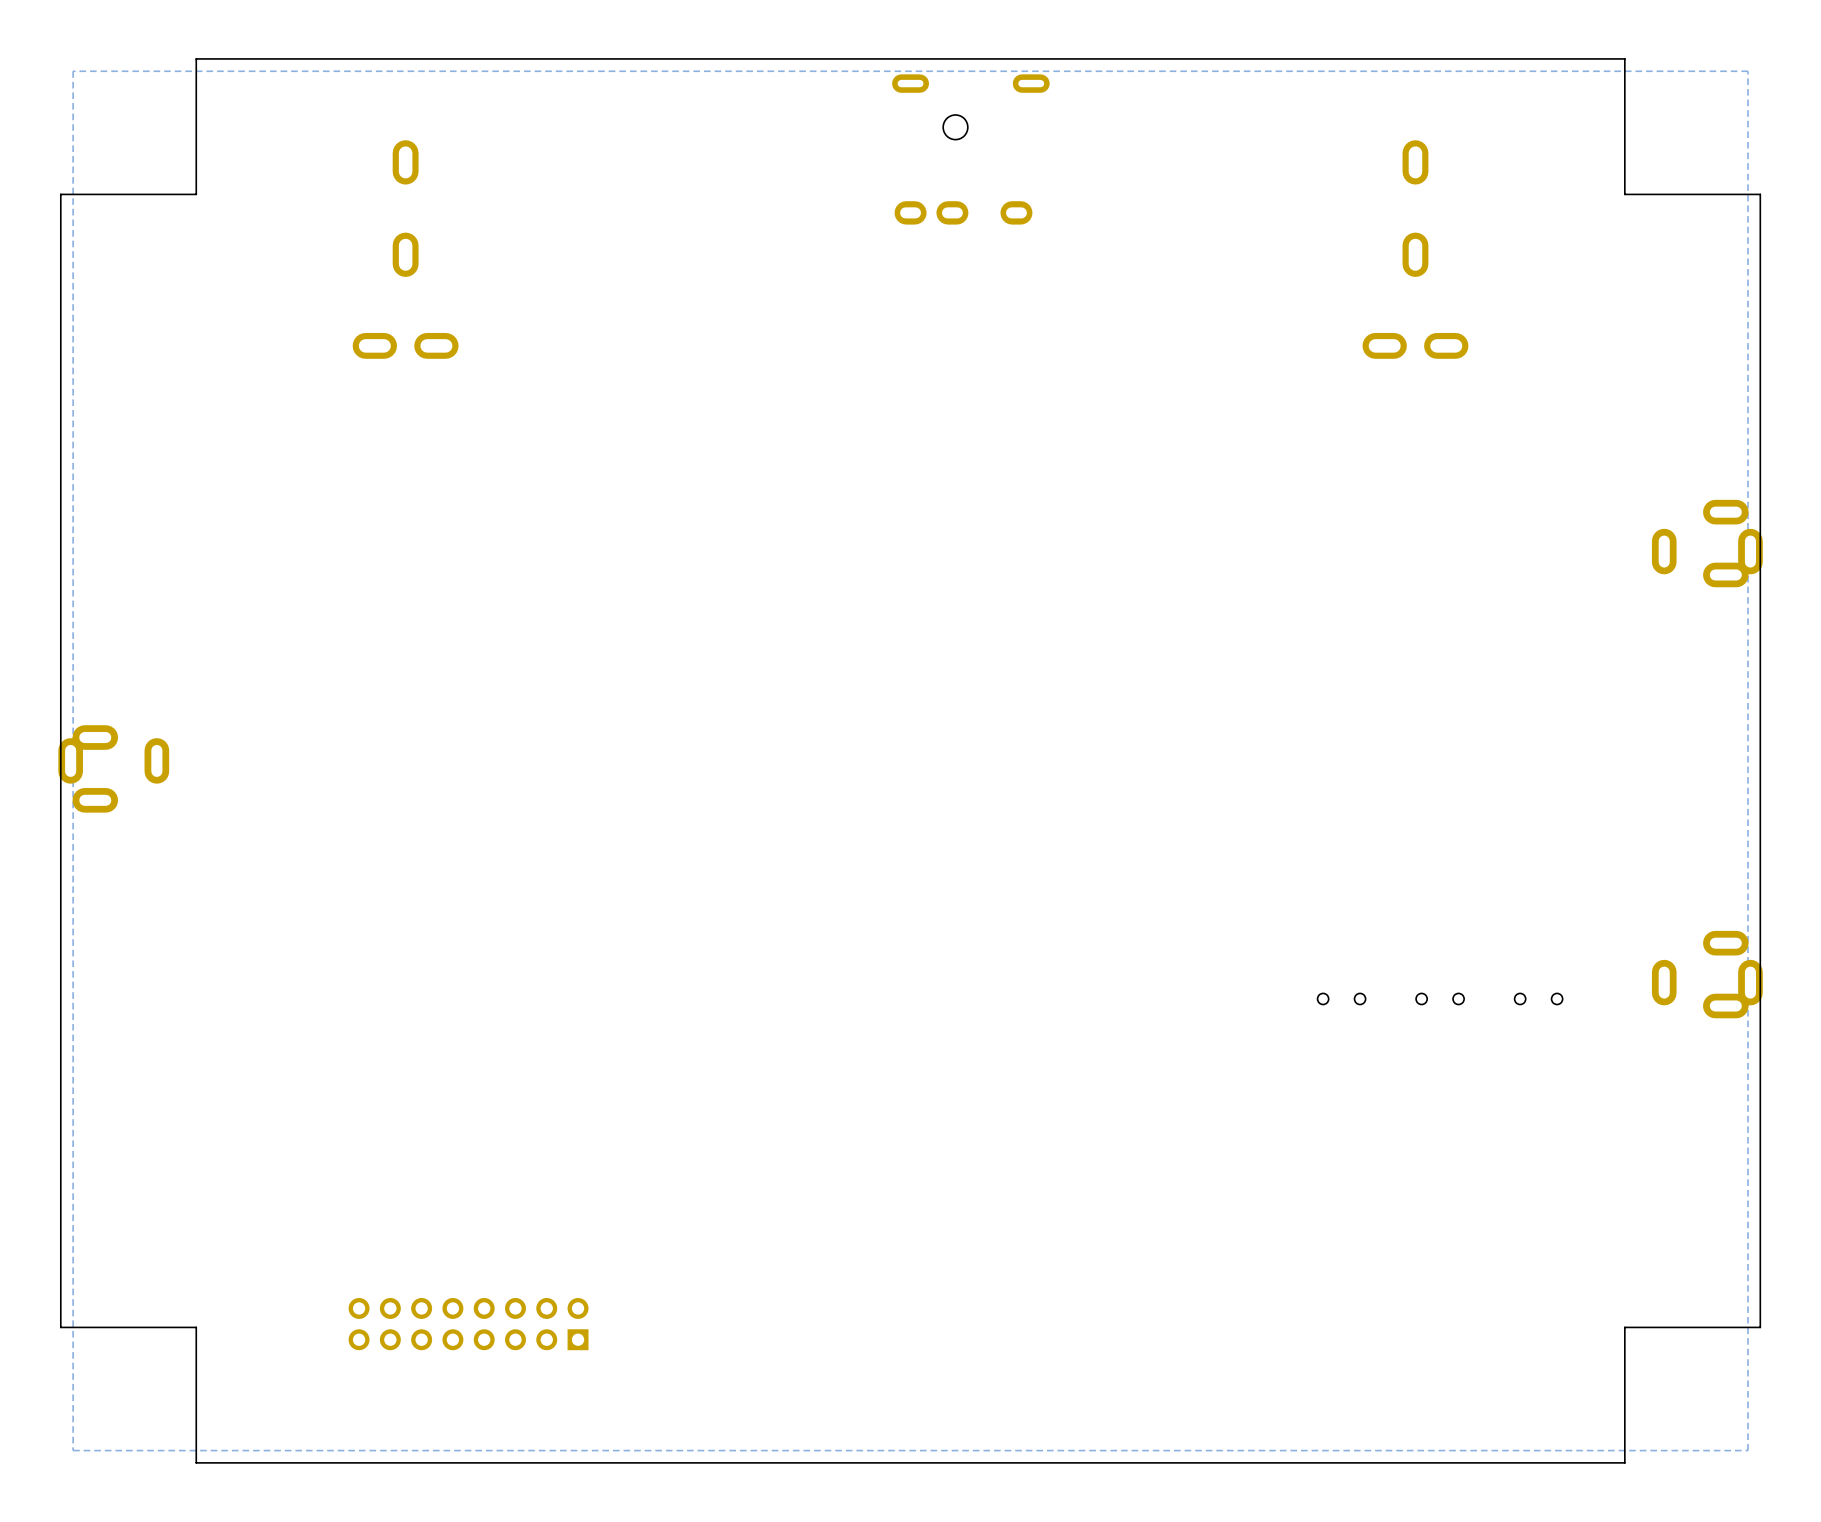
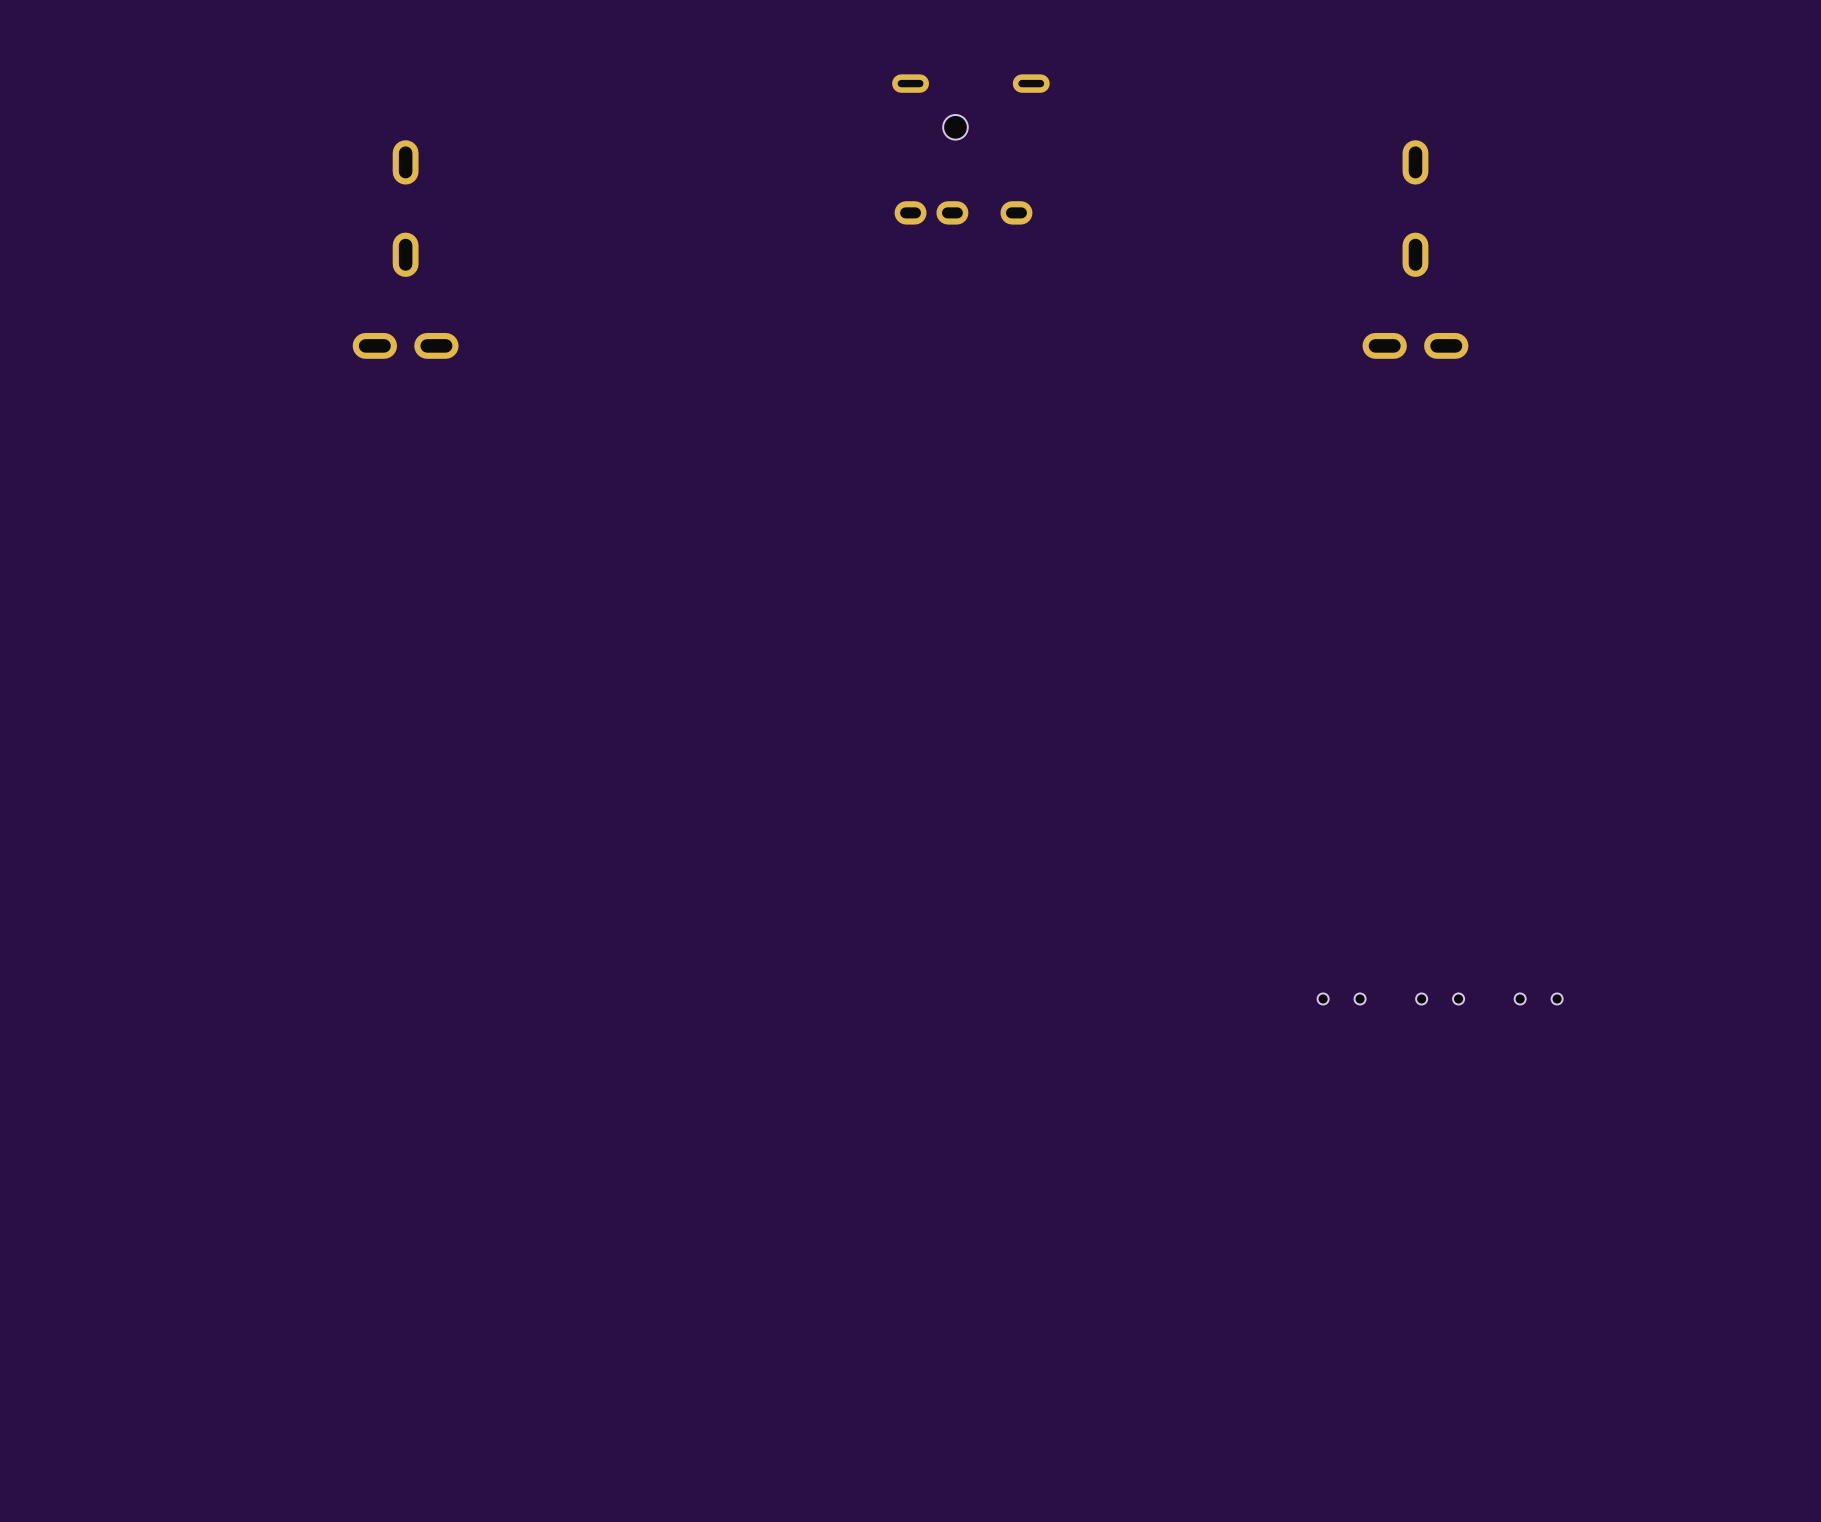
board edge: (1624, 58) (1624, 194) (1760, 194) (1760, 1327) (1624, 1327) (1624, 1462) (196, 1462) (196, 1327) (60, 1327) (60, 194) (196, 194) (196, 58) (1624, 58) -> none
zone outline: (1747, 71) (73, 71) (73, 1450) (1747, 1450) (1747, 71) -> none
part: (1707, 543) -> none
part: (113, 768) -> none
part: (1707, 974) -> none
part: (468, 1324) -> none

